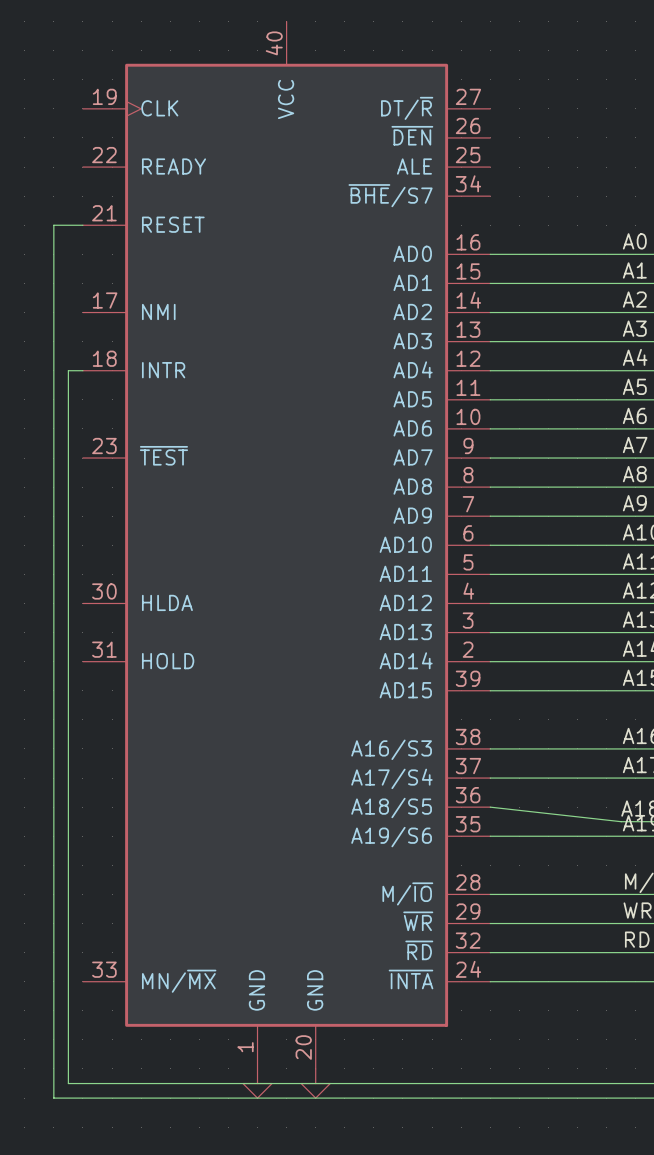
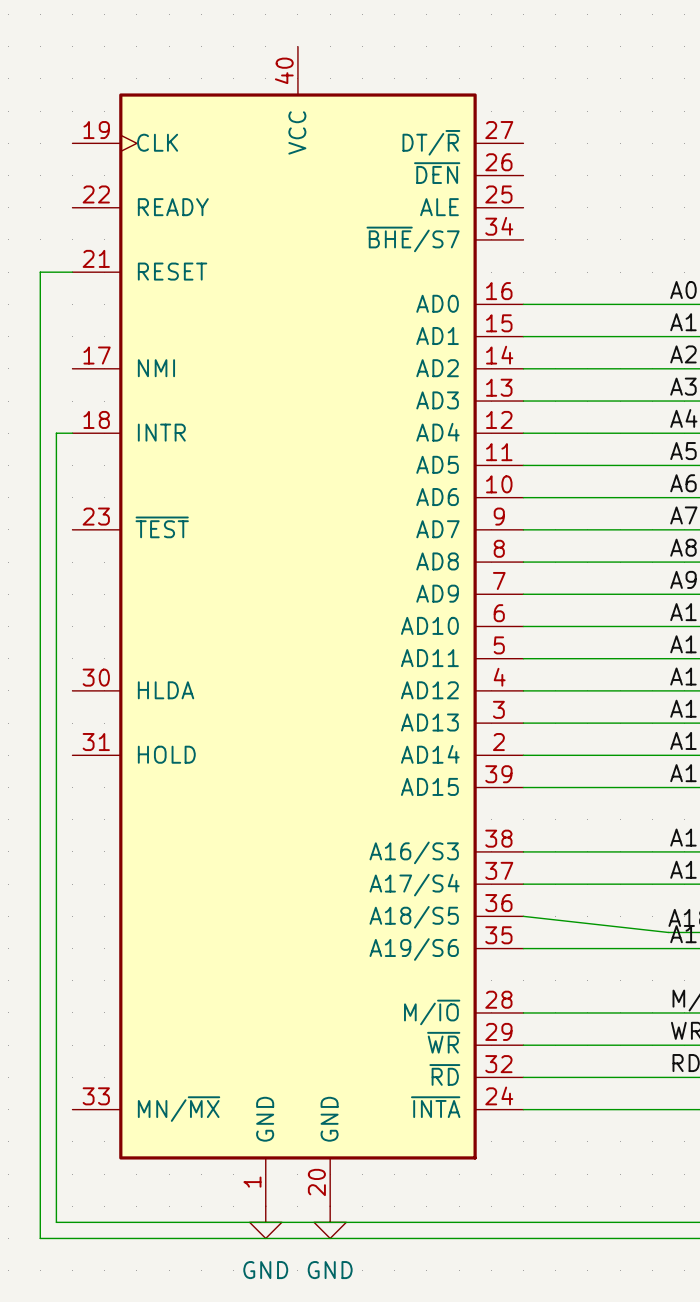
power symbol text: none -> GND (265, 1270)
power symbol text: none -> GND (330, 1270)

